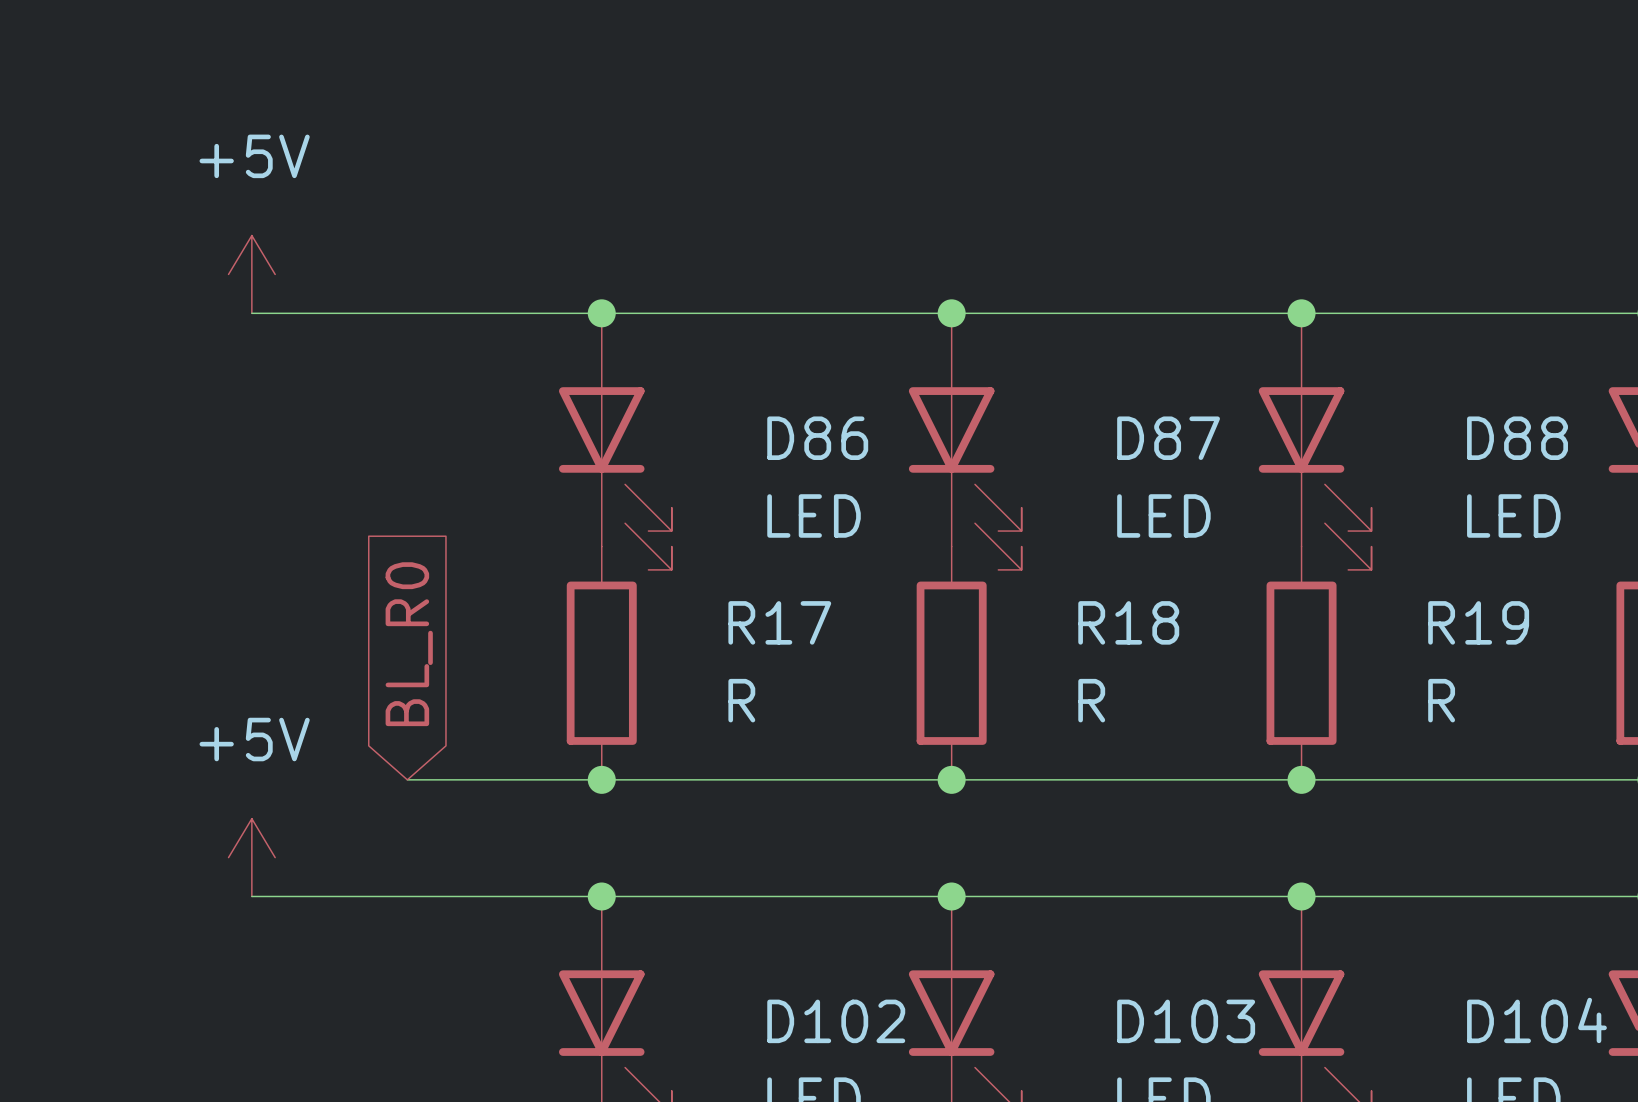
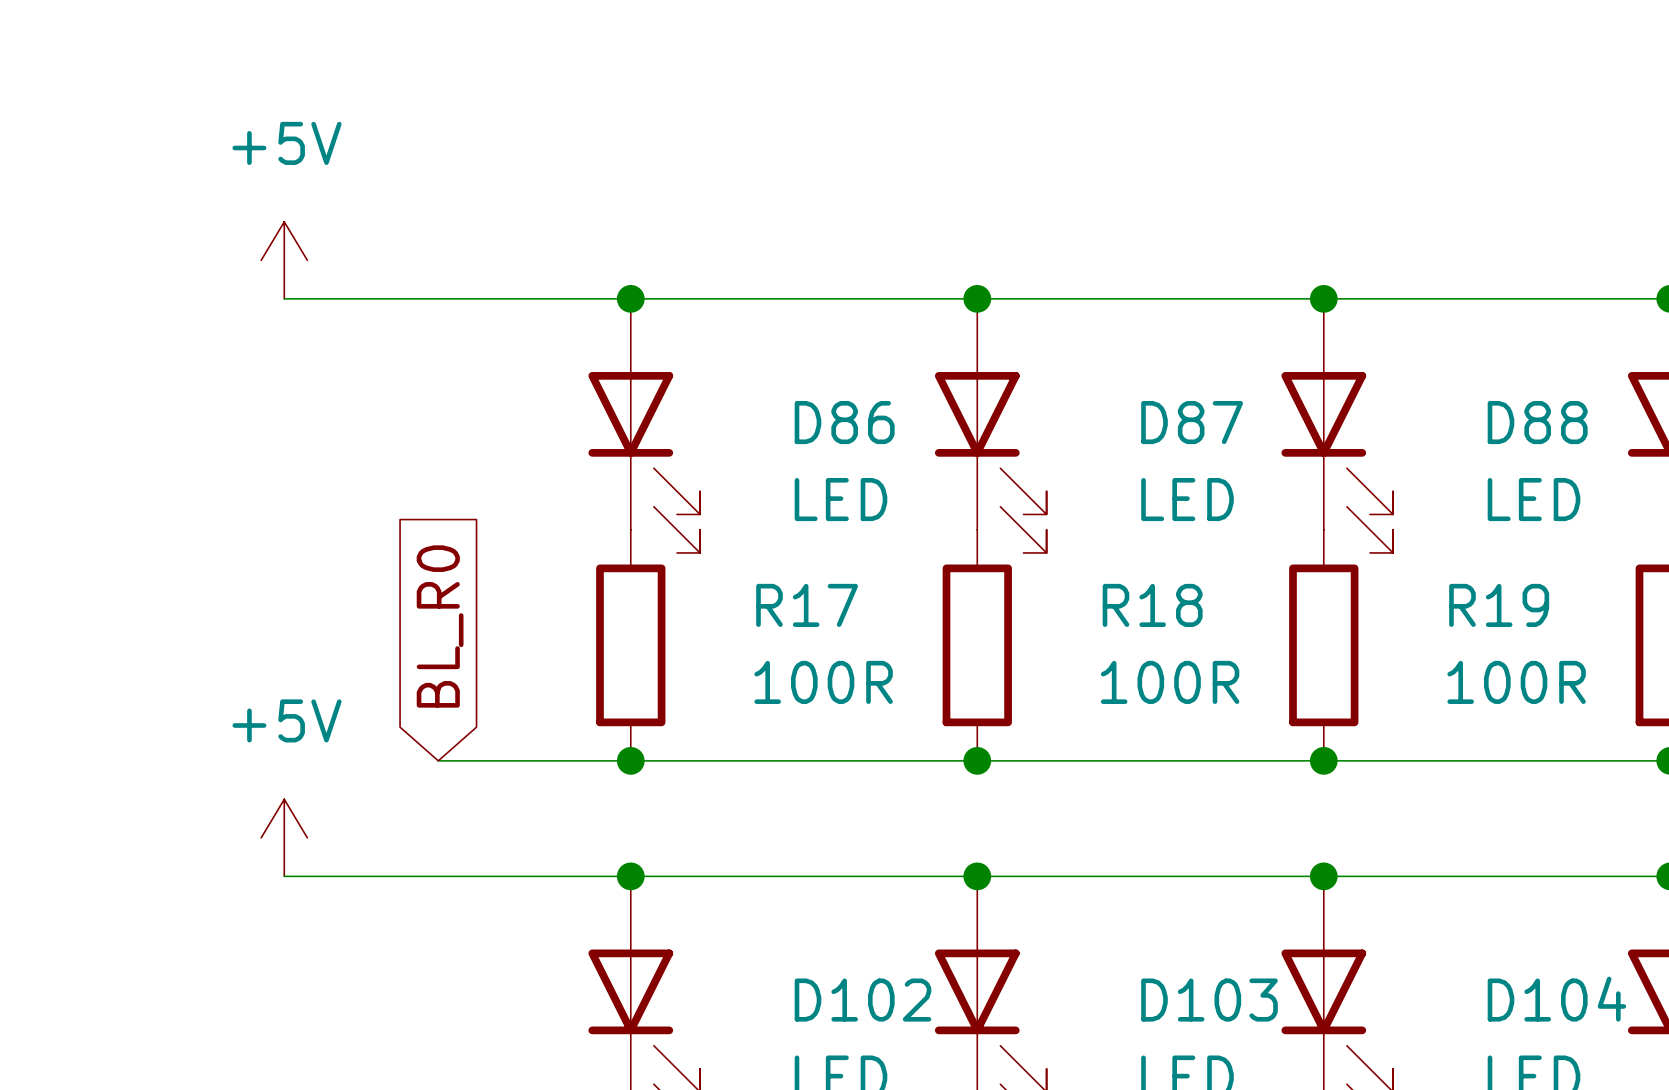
R17 value: R (741, 700) -> 100R (823, 682)
R18 value: R (1091, 700) -> 100R (1170, 682)
R19 value: R (1441, 700) -> 100R (1516, 682)

